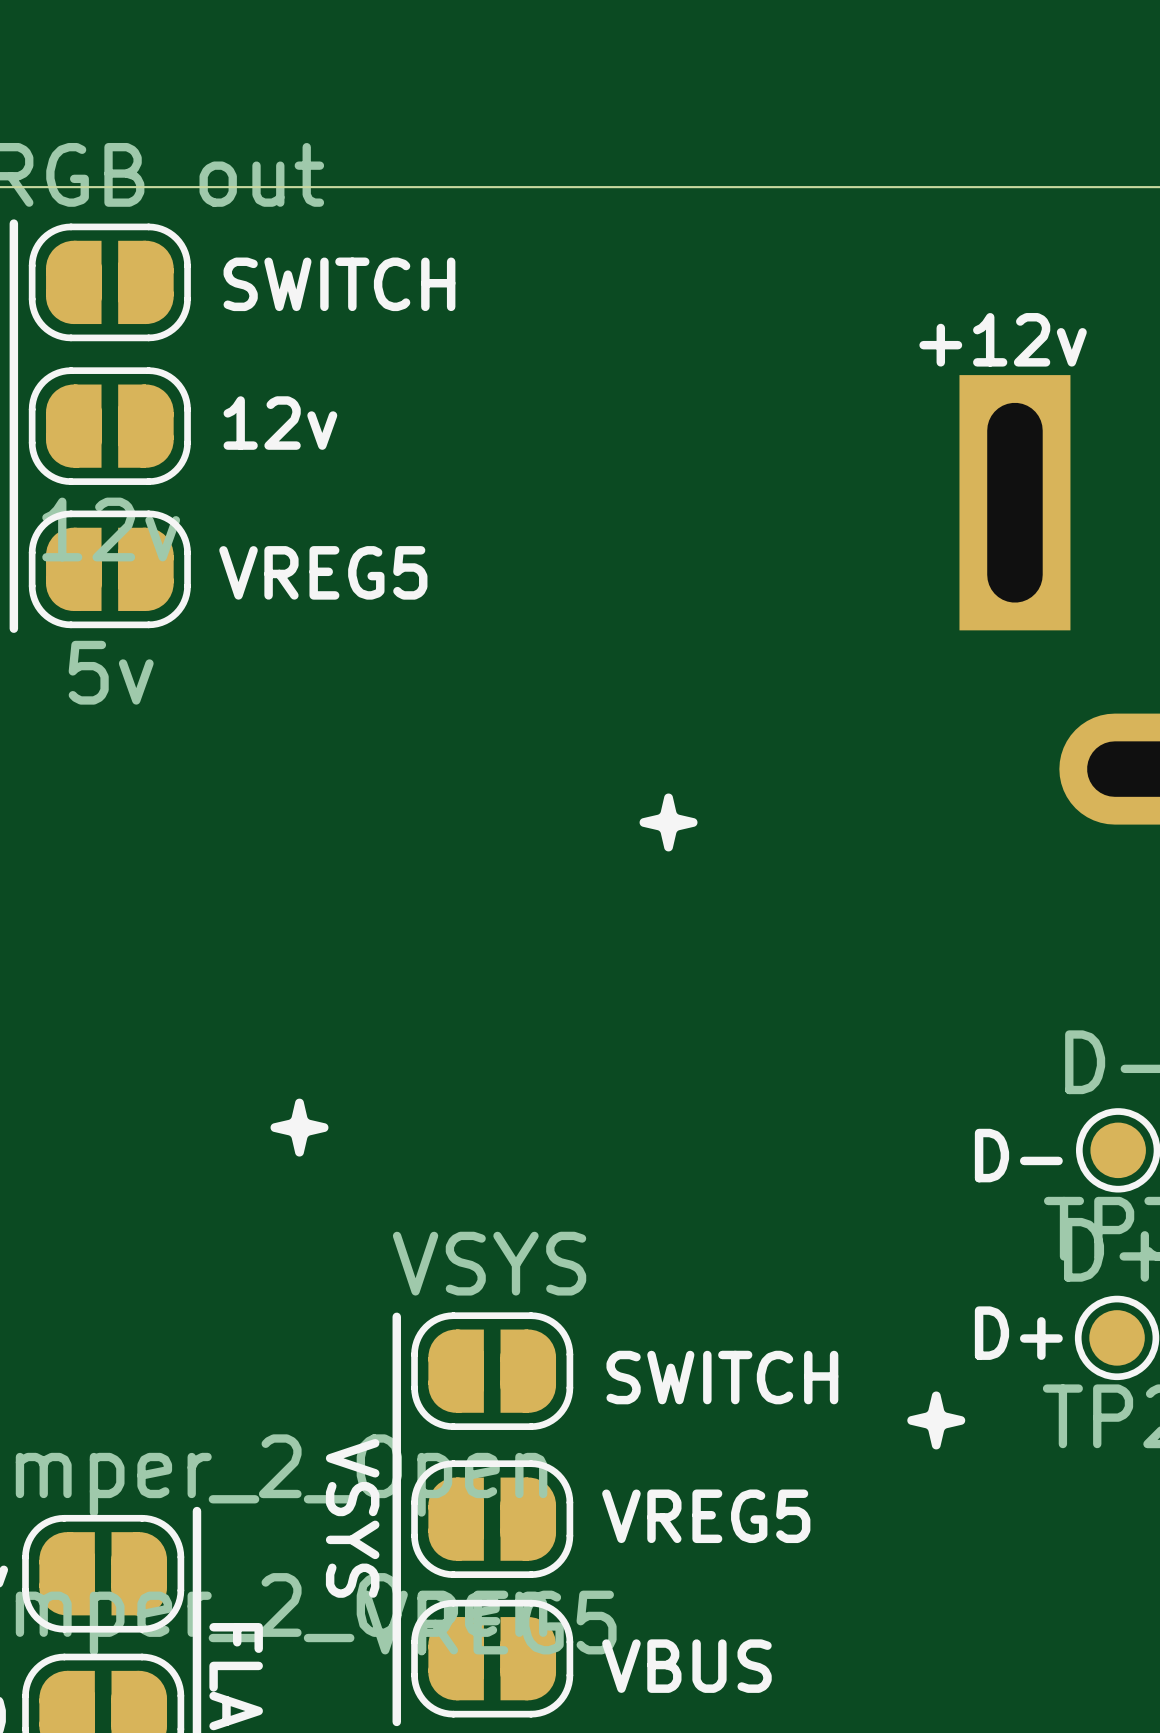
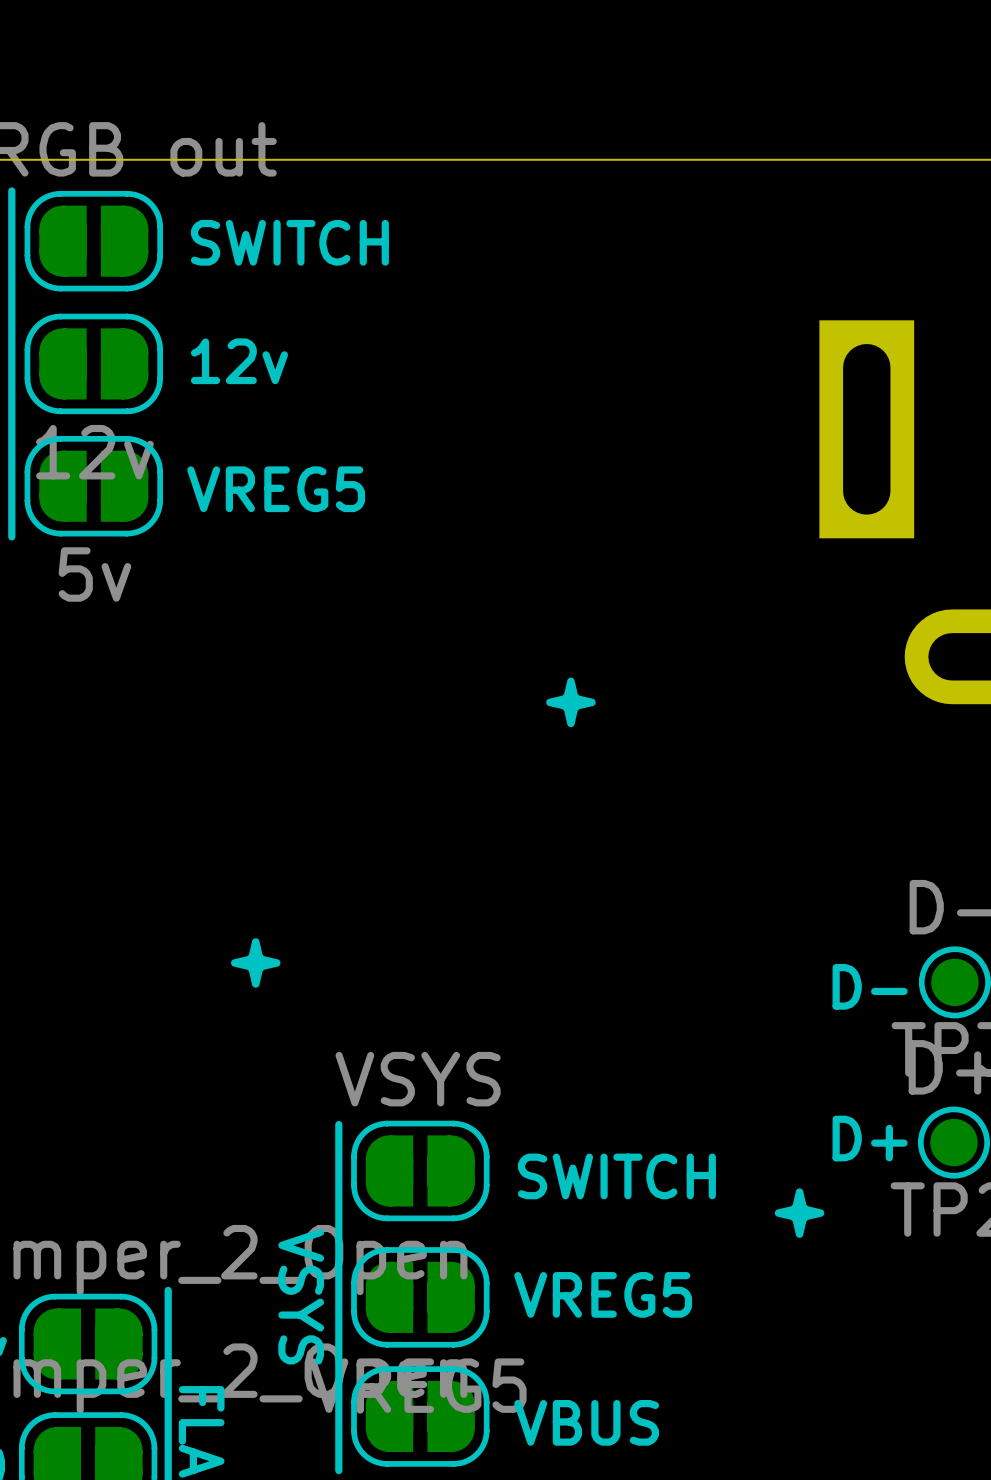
text: +12v (1003, 339) -> none

